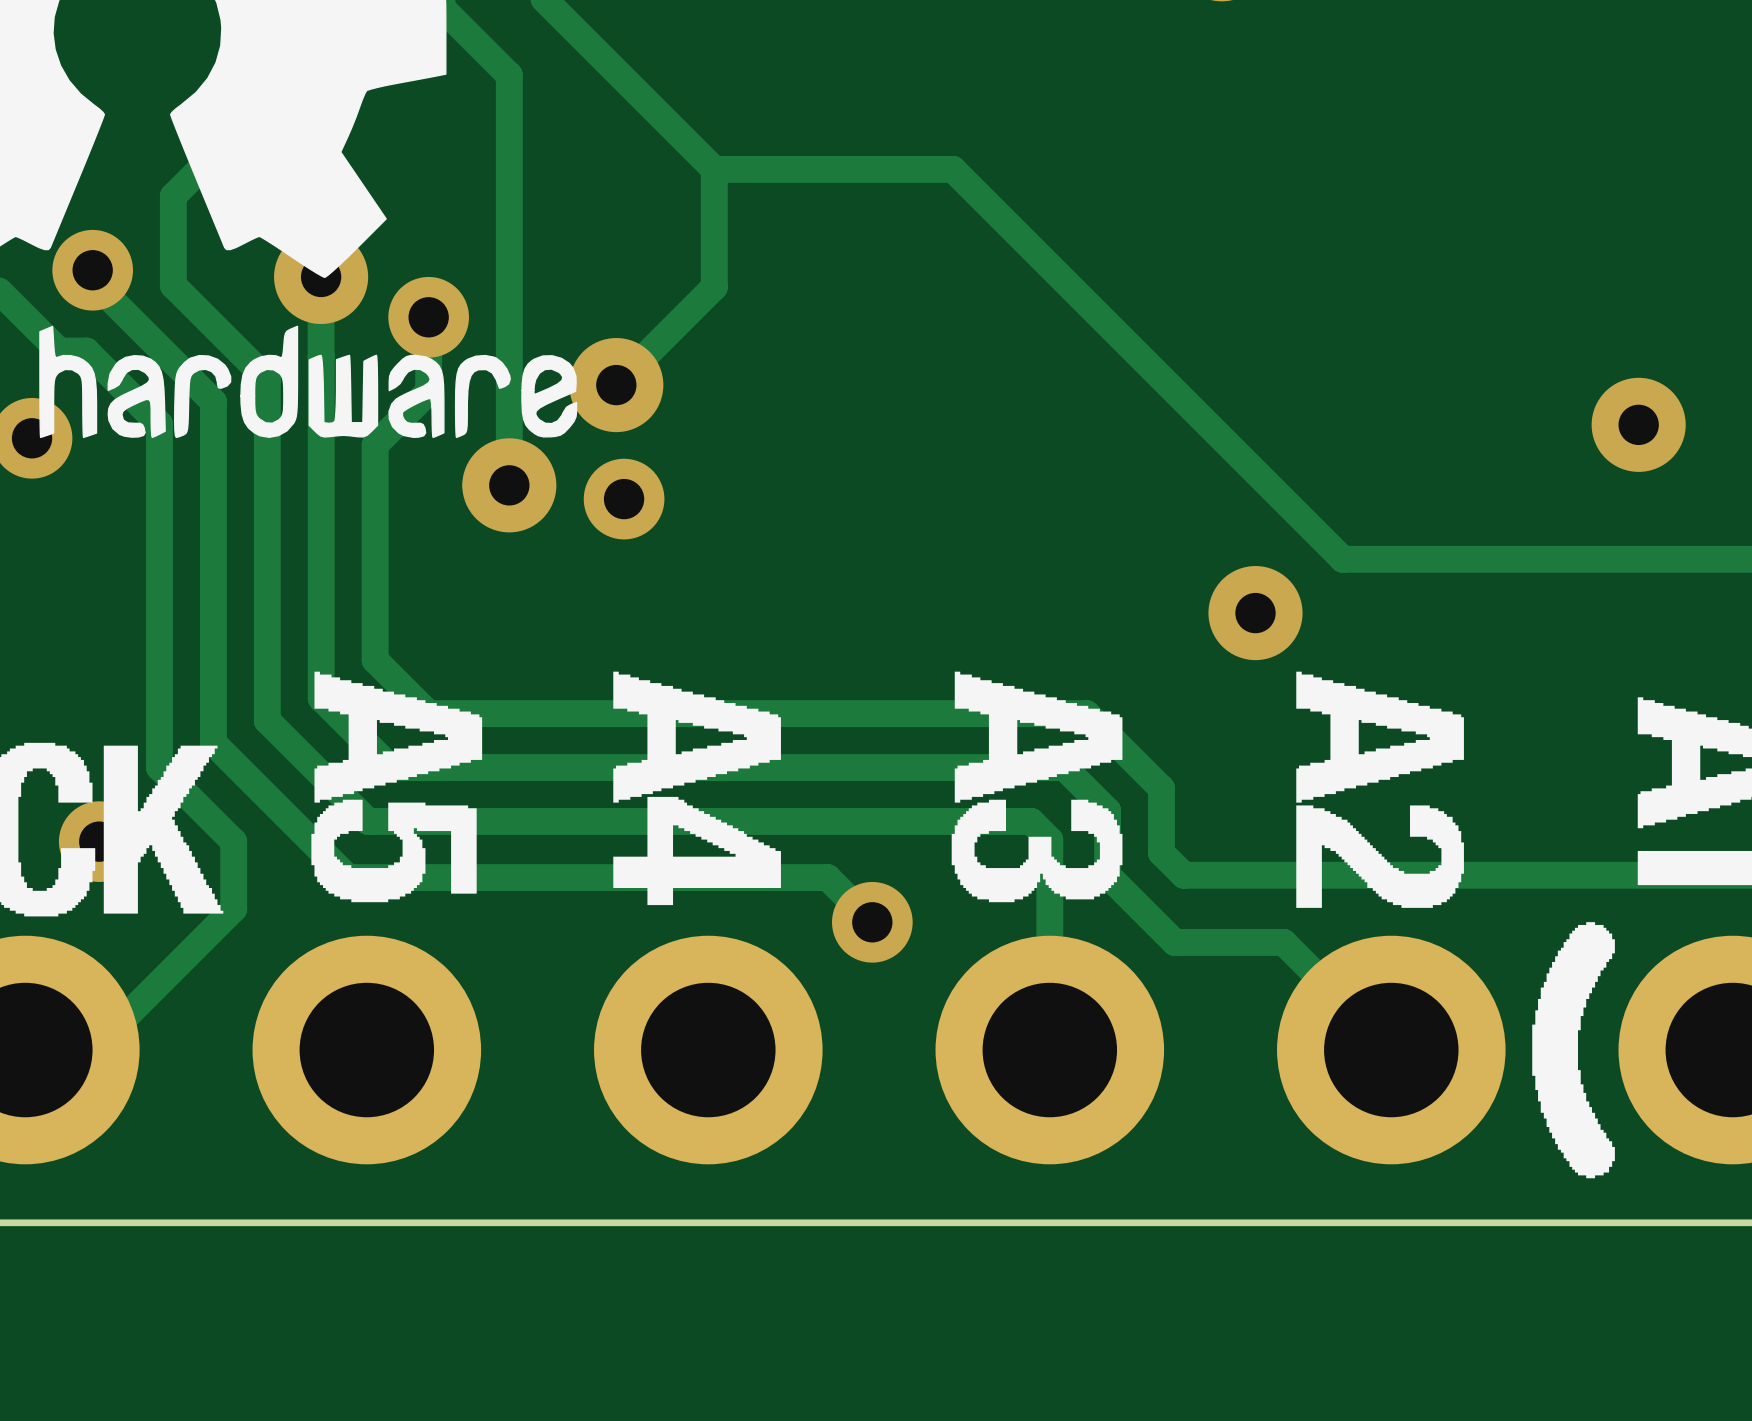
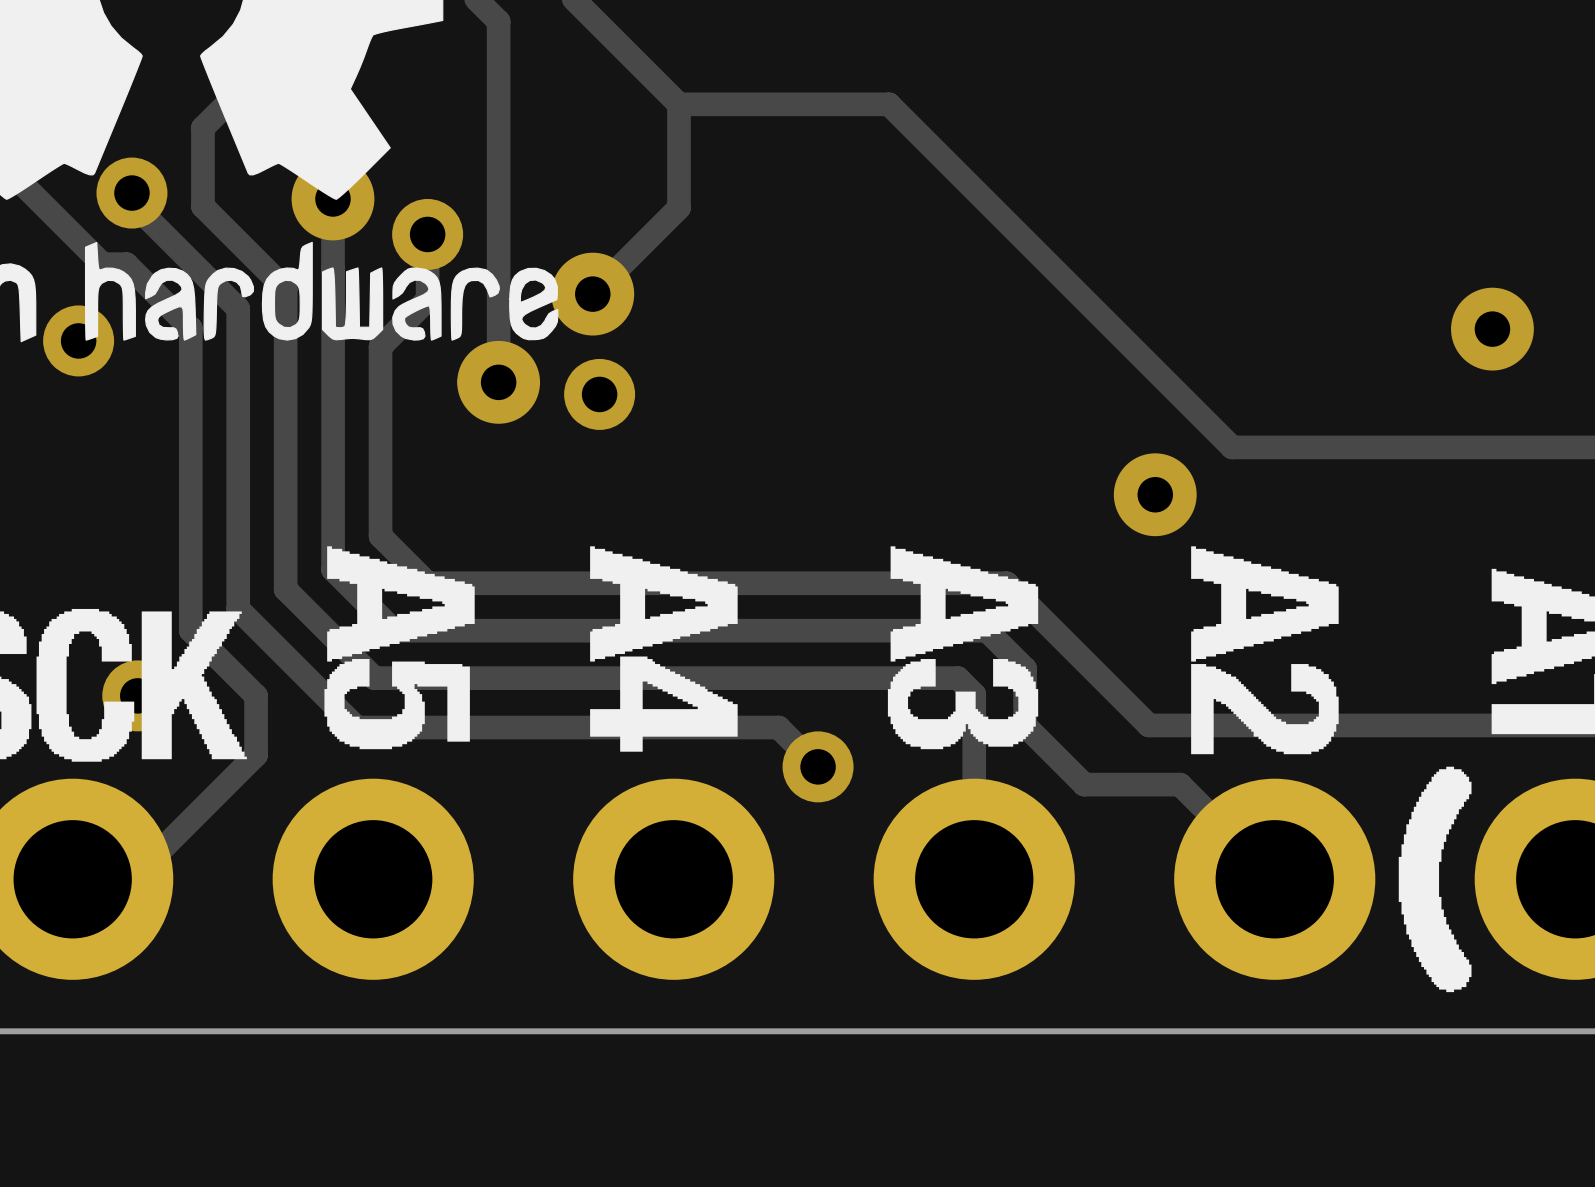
track: (1161, 788) (1161, 852) (1183, 875) (1248, 875) -> (1072, 649) (1148, 725)

